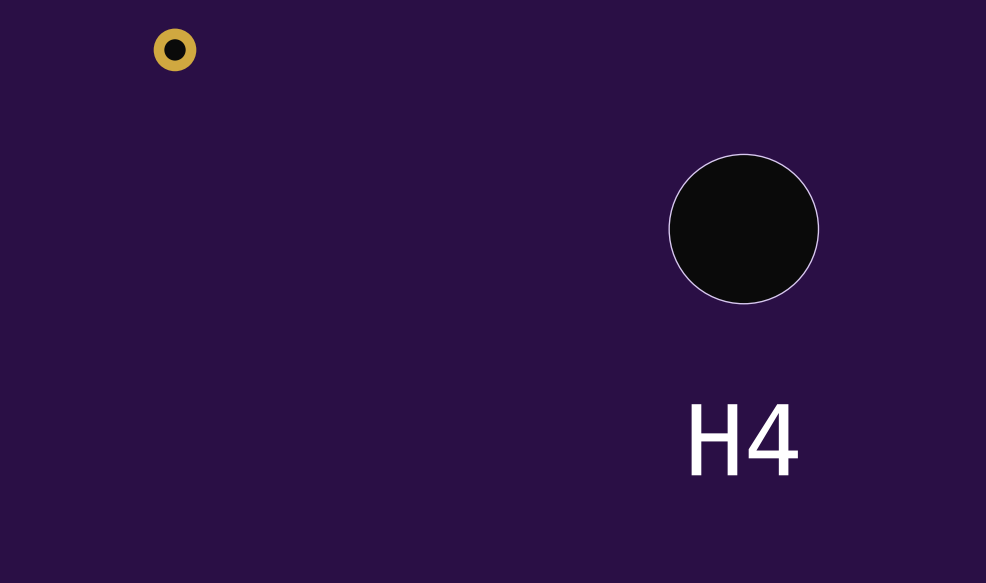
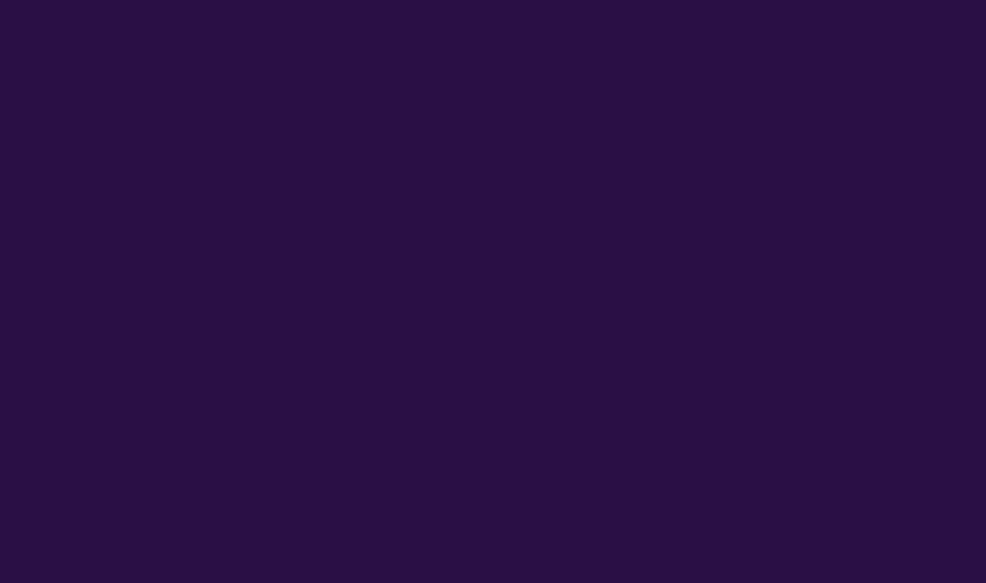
via: (175, 49) -> none
H4: (743, 229) -> none

